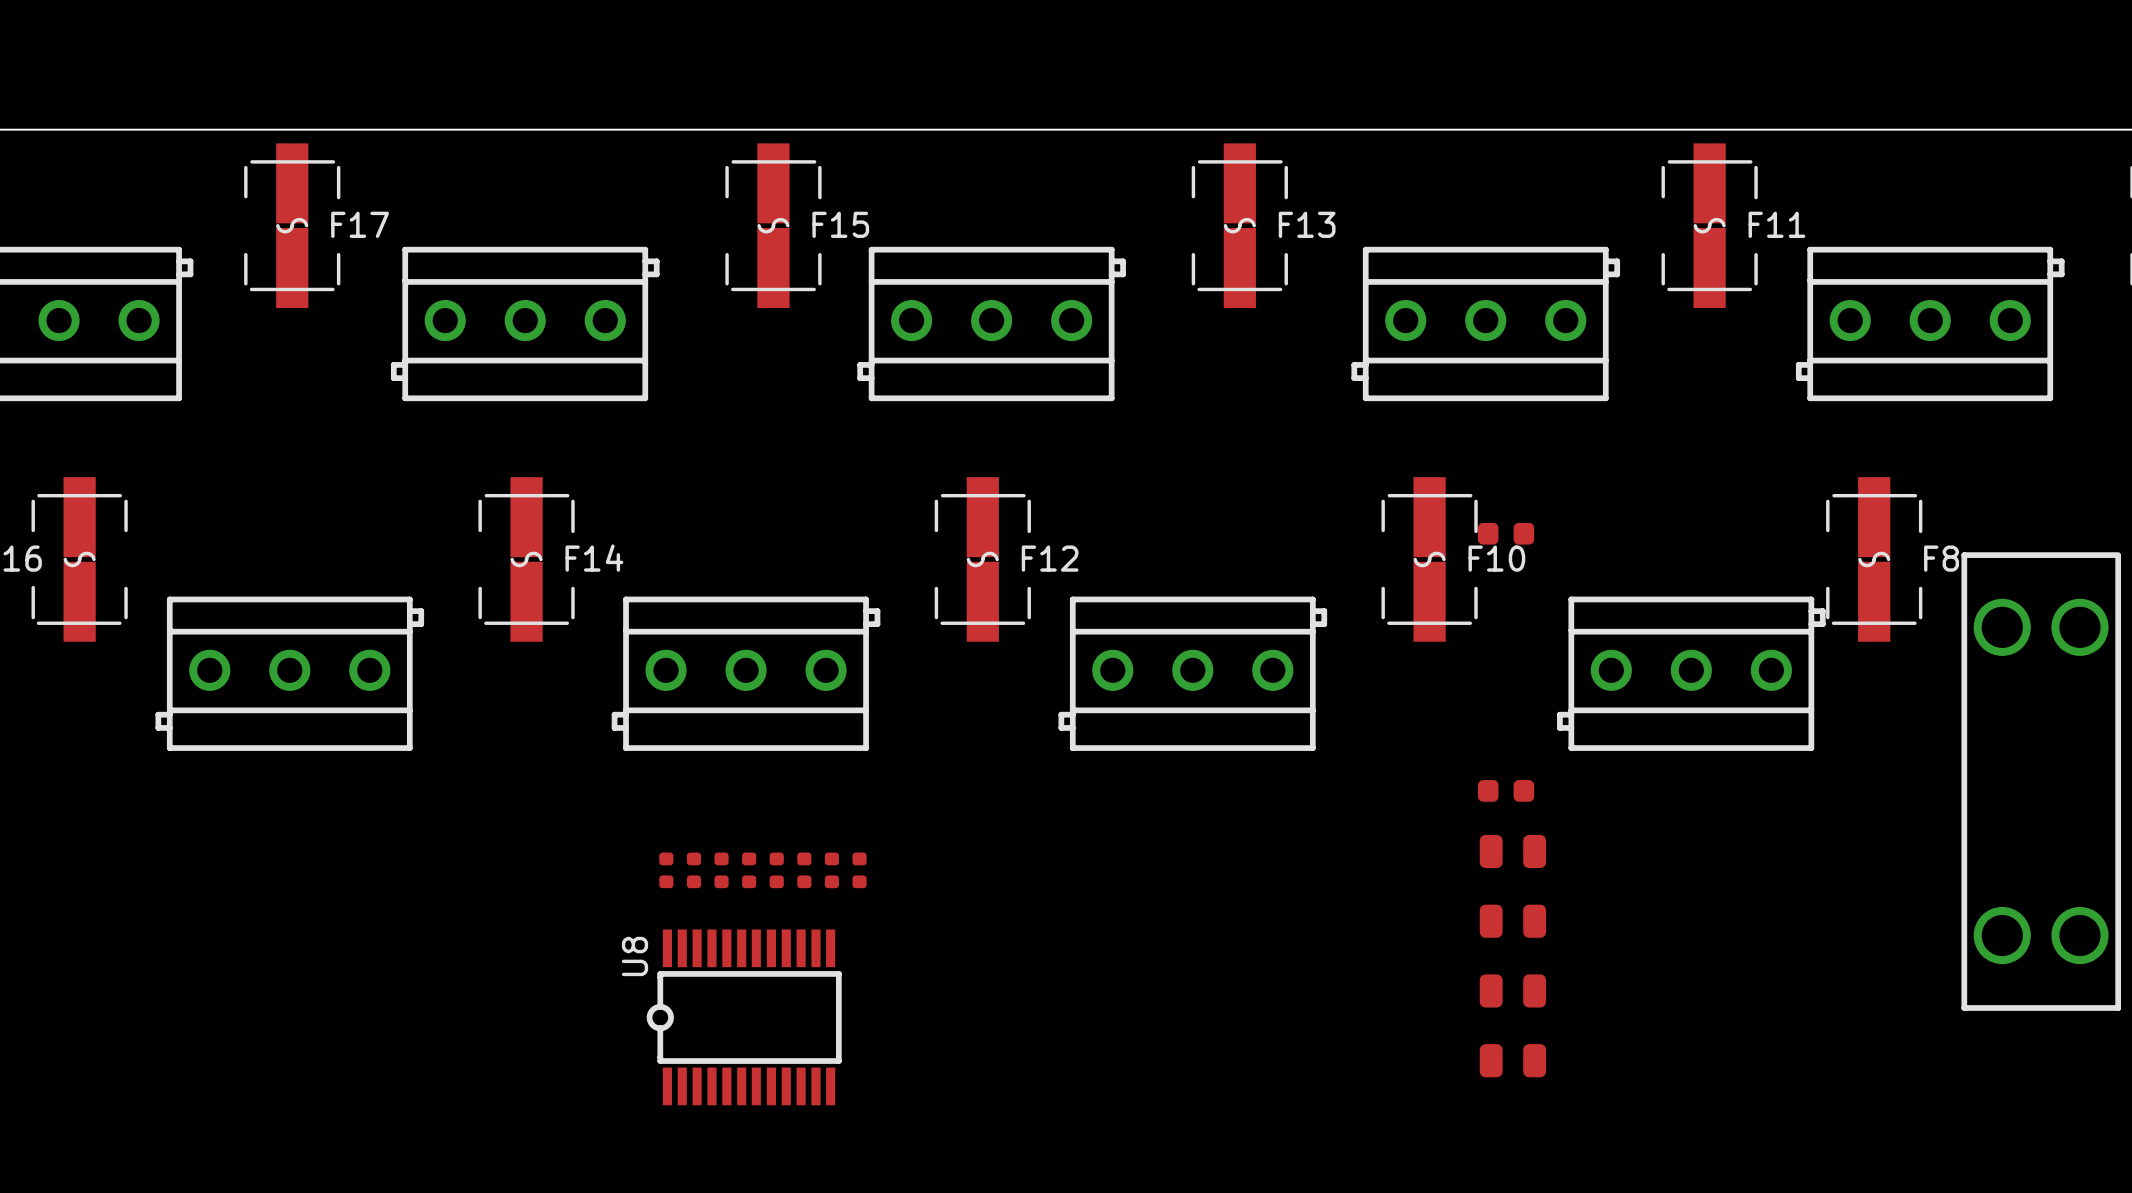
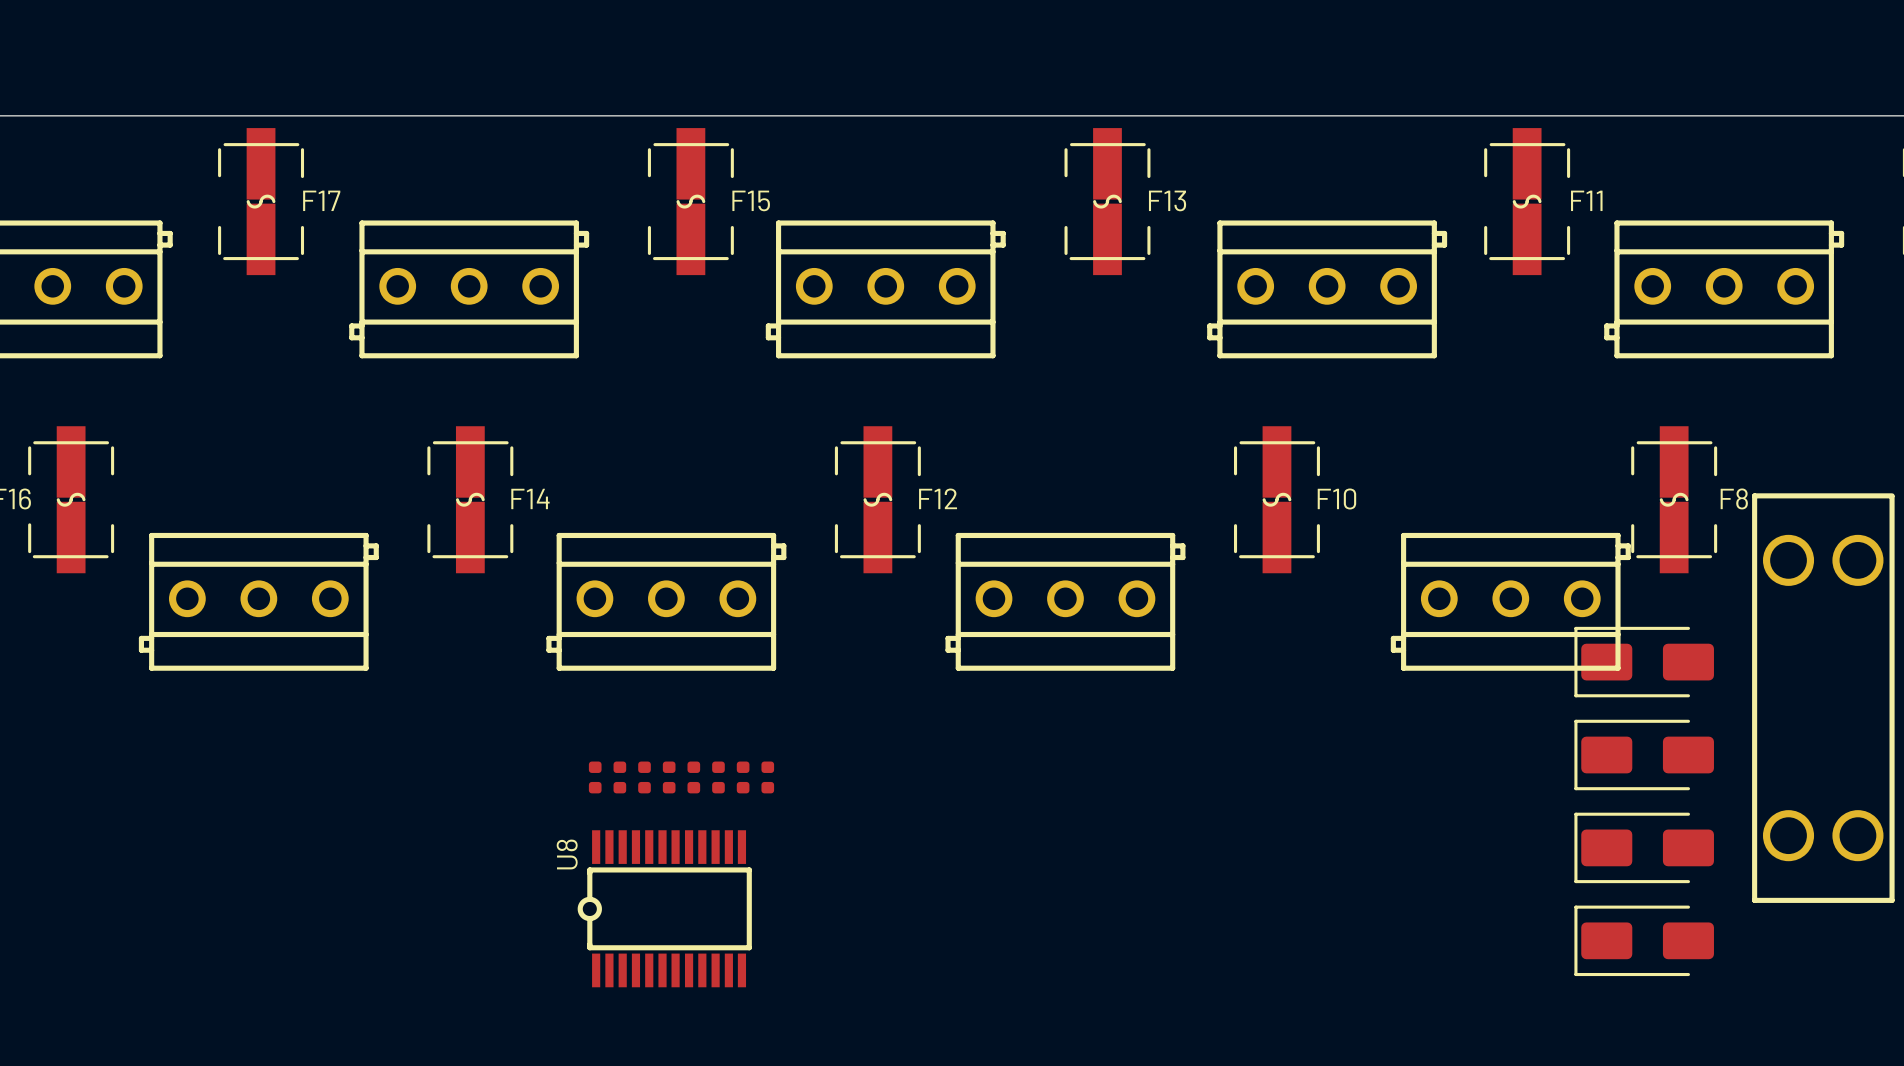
part: (1506, 533) -> none
part: none -> (1644, 662)
part: (1506, 790) -> none
part: none -> (1644, 754)
part: (1512, 851) -> none
part: (1512, 921) -> none
part: none -> (1644, 847)
part: (1512, 990) -> none
part: none -> (1644, 940)
part: (1512, 1060) -> none

